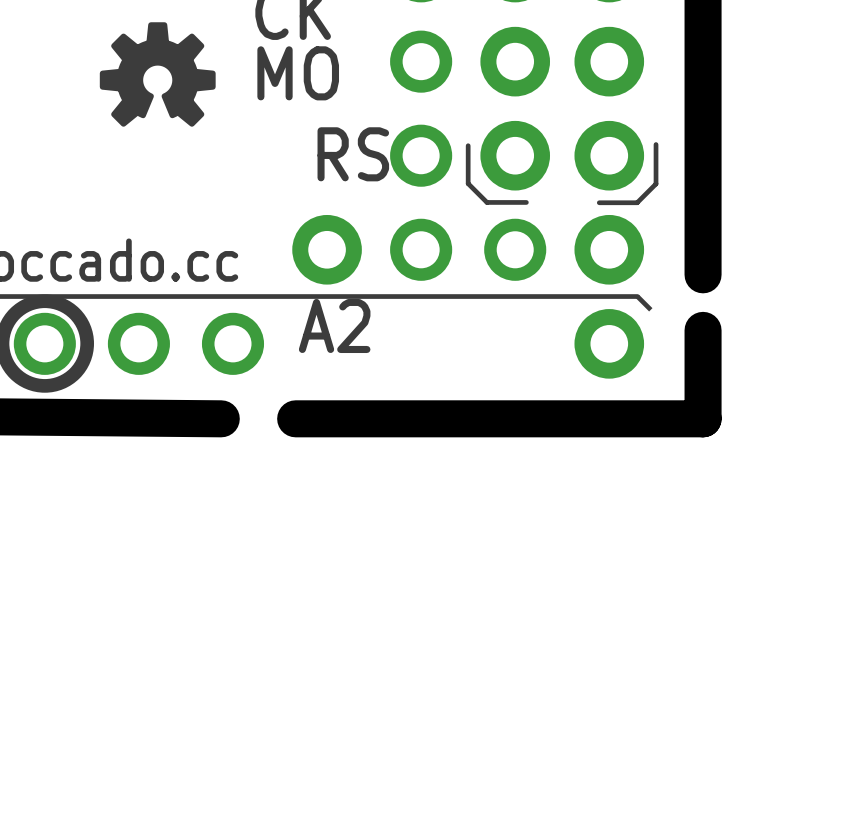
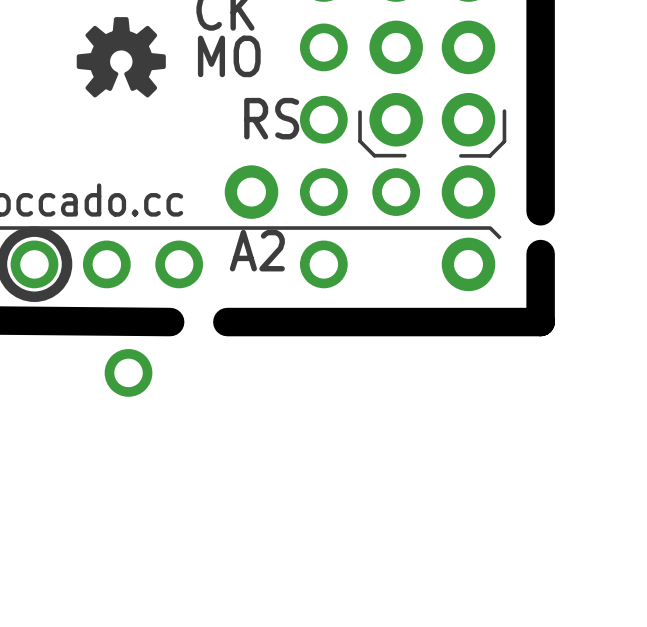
part: none -> (323, 264)
part: none -> (128, 372)

